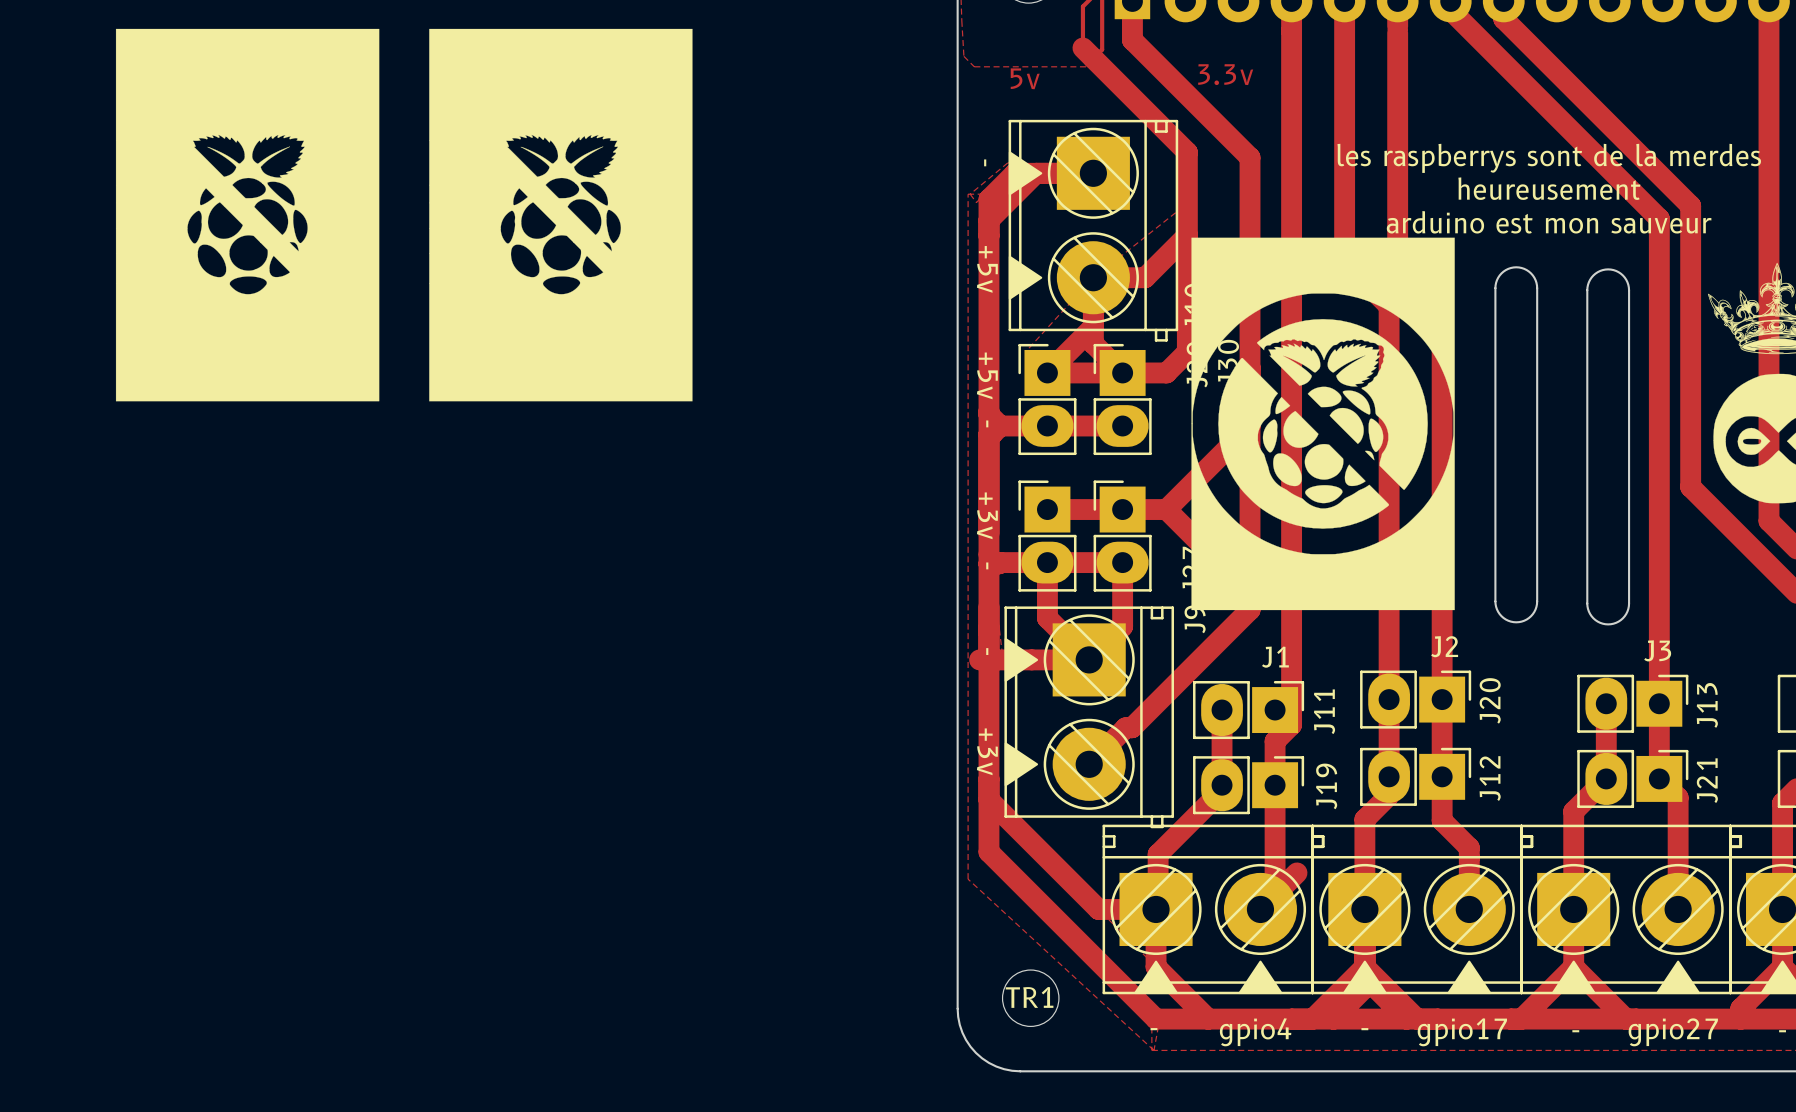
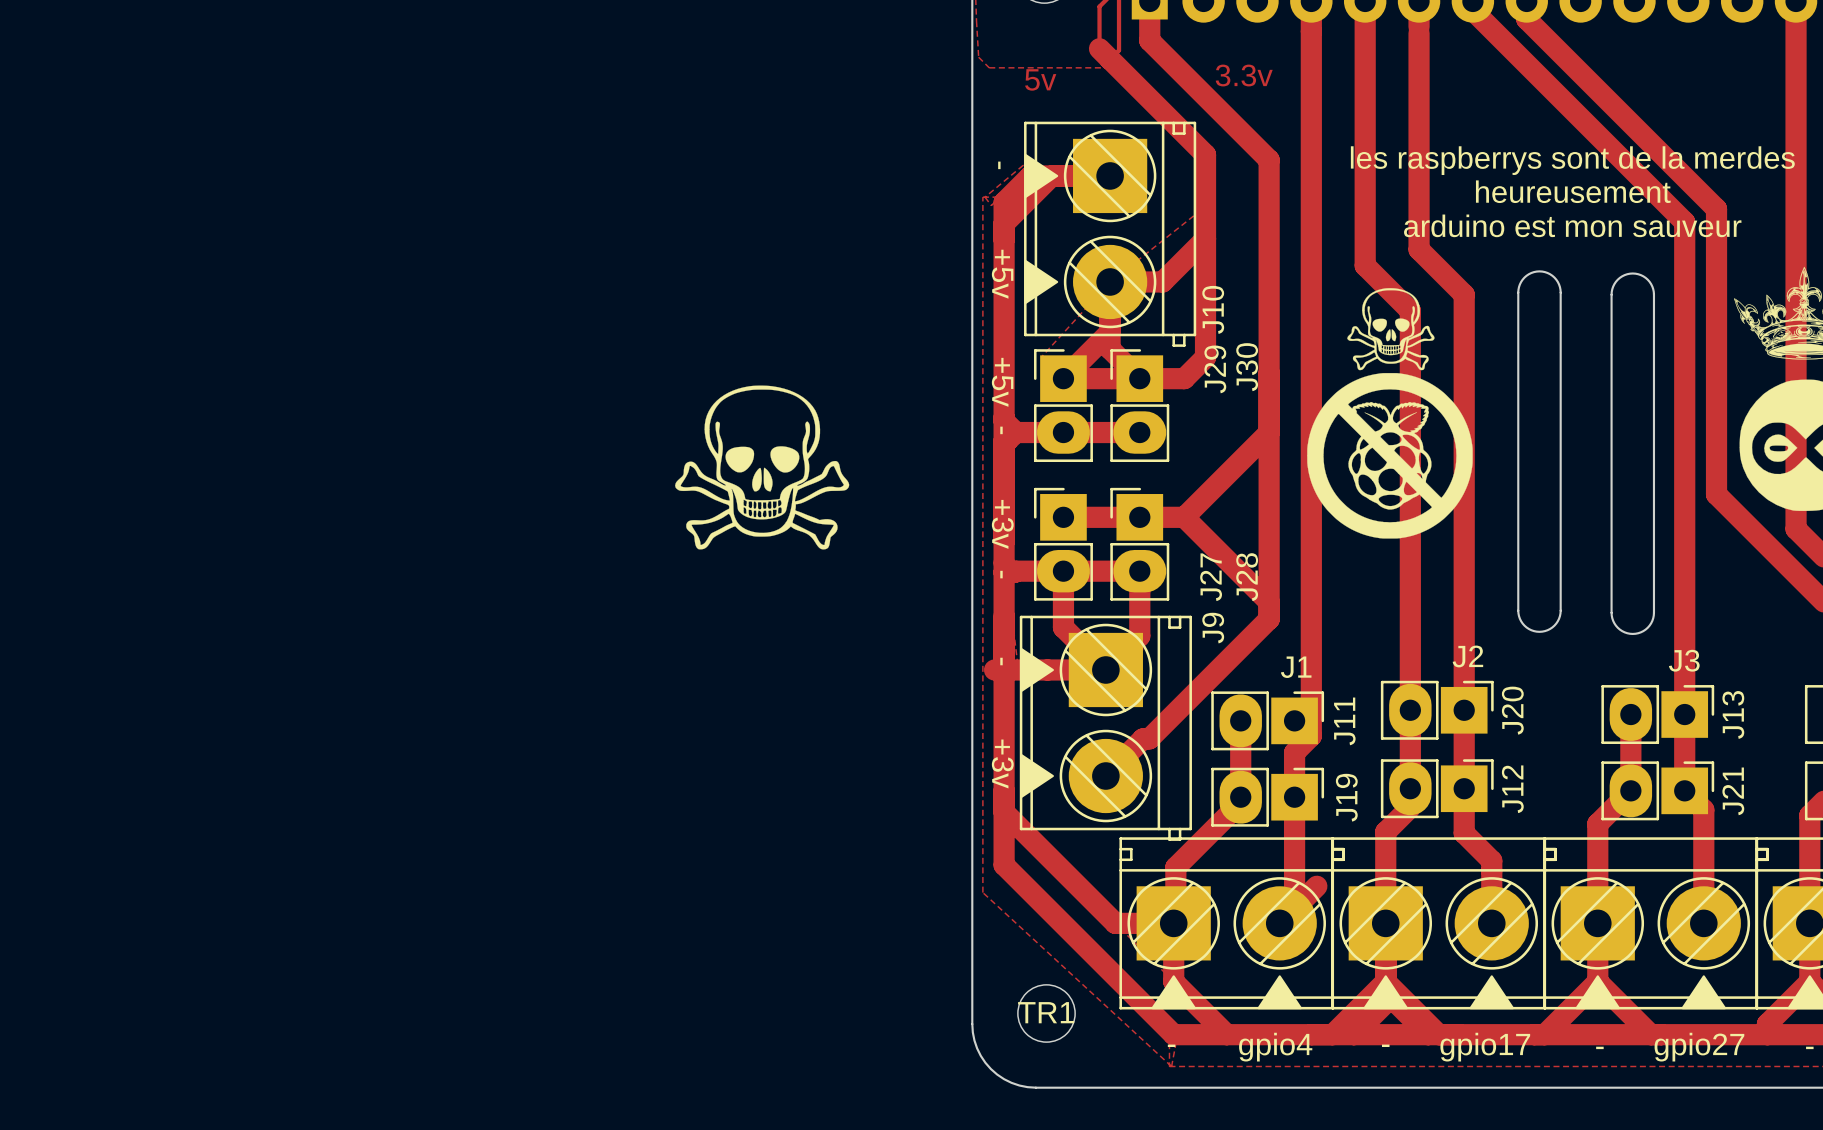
drawing: [115, 28, 380, 402] -> none
drawing: [429, 28, 693, 402] -> none
drawing: [1191, 237, 1455, 611] -> none
drawing: none -> [1307, 288, 1473, 539]
drawing: none -> [675, 385, 850, 550]

